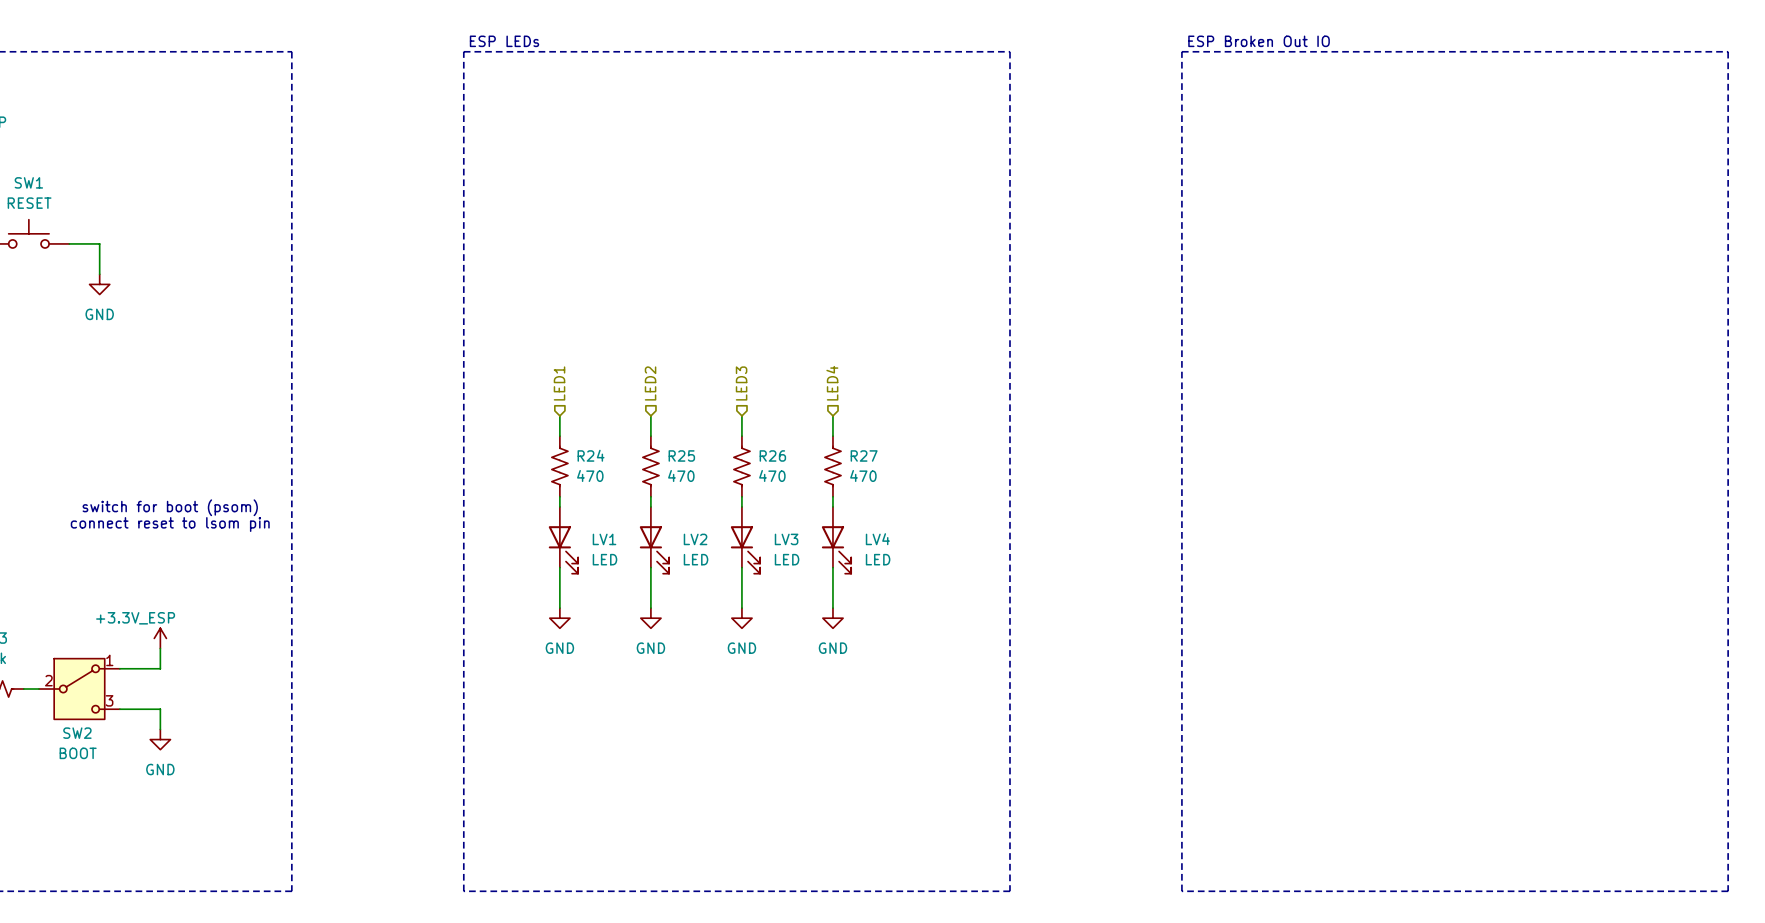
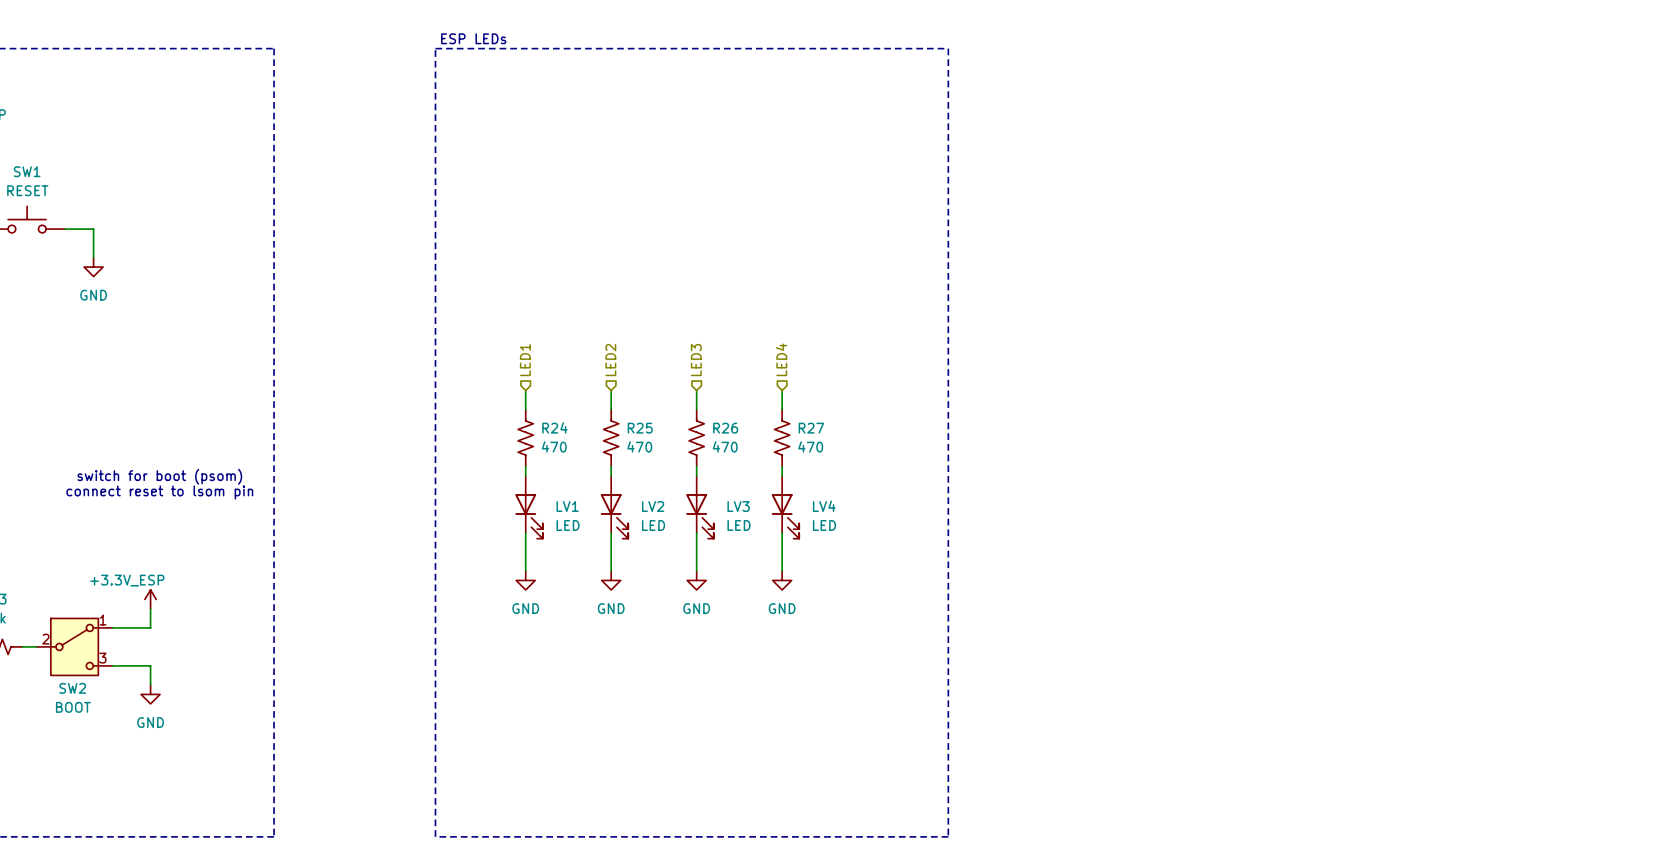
text: ESP Broken Out IO (1259, 41) -> none
line: (1181, 51) (1728, 51) (1728, 891) (1181, 891) (1181, 51) -> none

